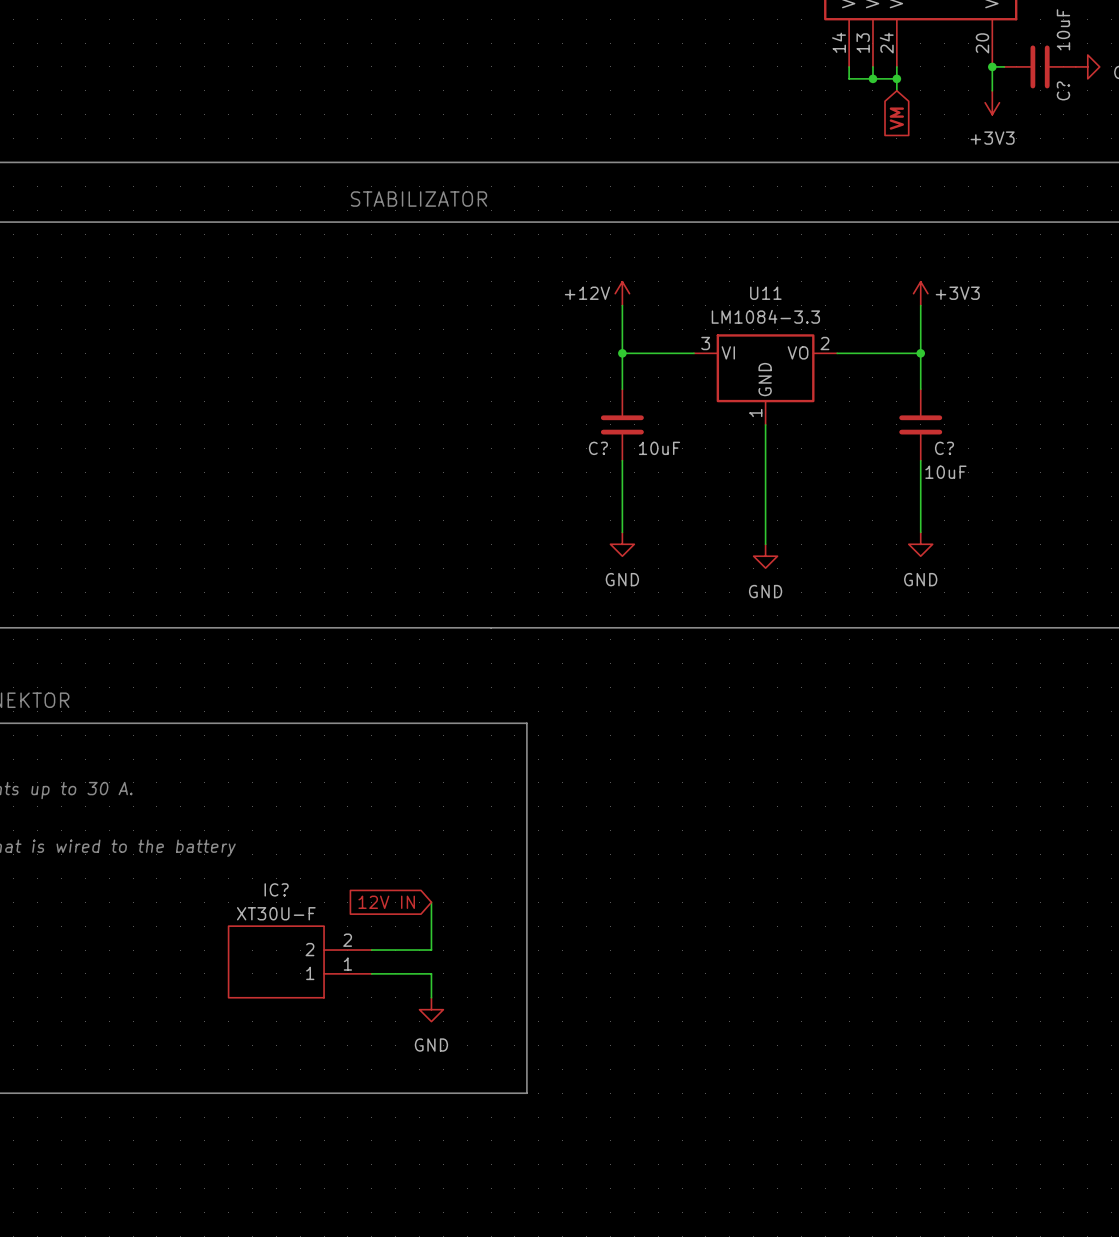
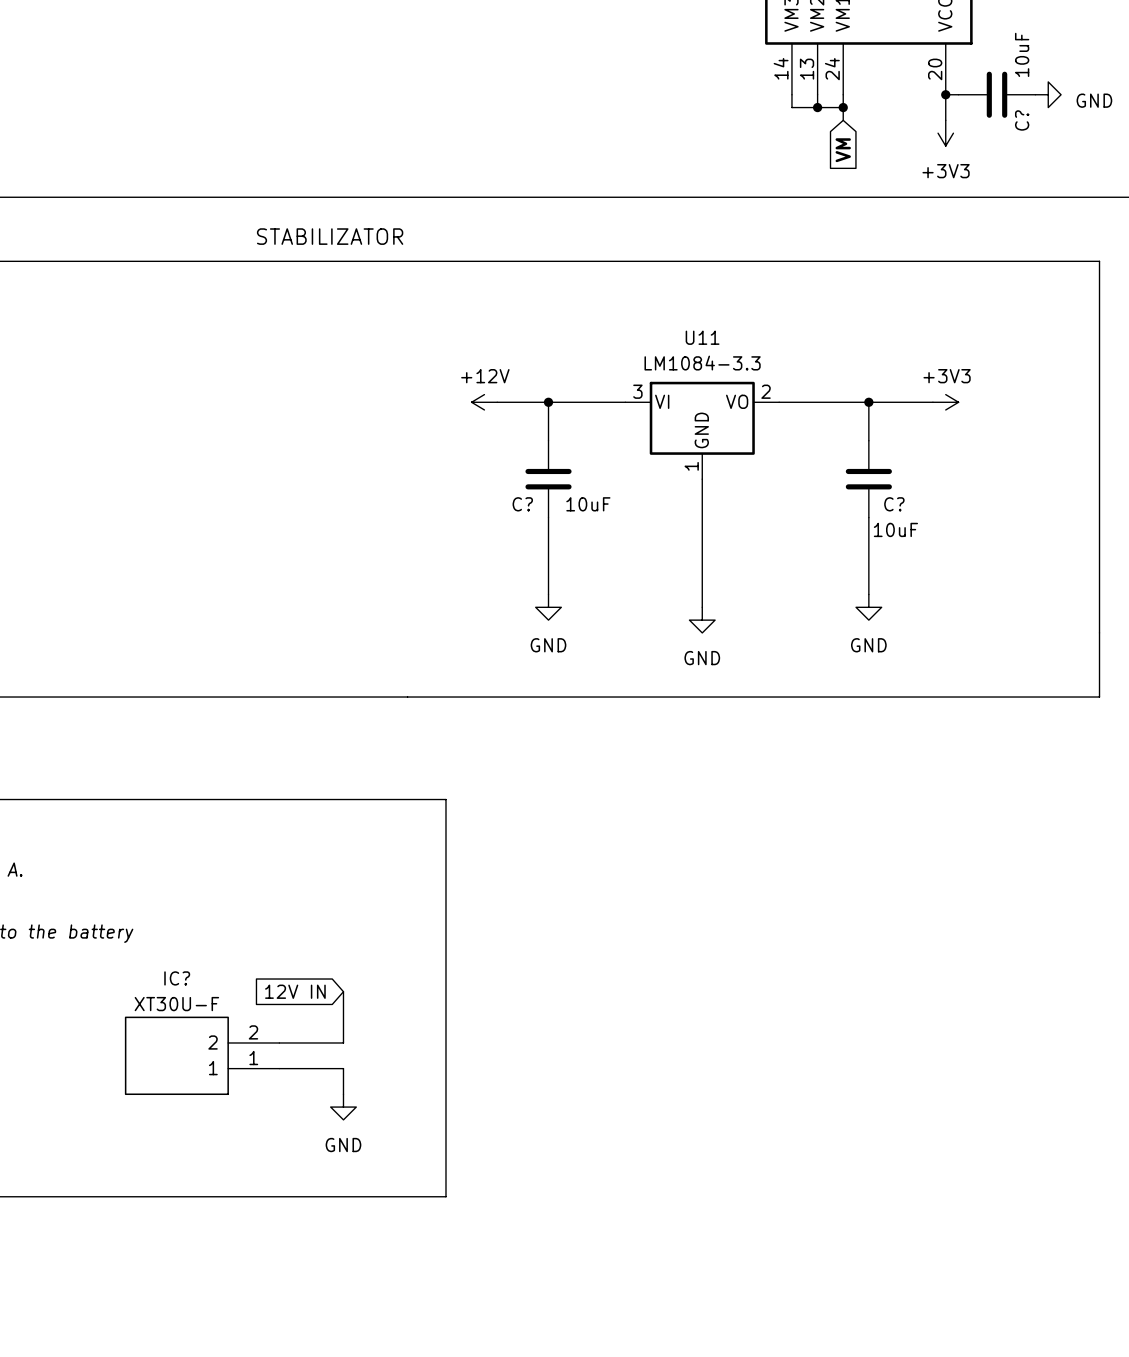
power symbol text position: +12V (587, 293) -> +12V (485, 376)
power symbol rotation: 0° (622, 293) -> 90° counterclockwise (484, 402)
power symbol position: +12V (622, 293) -> +12V (484, 402)
power symbol rotation: 0° (920, 293) -> 90° clockwise (945, 402)
power symbol position: +3V3 (920, 293) -> +3V3 (945, 402)
power symbol text position: +3V3 (957, 293) -> +3V3 (947, 376)
wire: (622, 305) (622, 353) -> (497, 402) (548, 402)
wire: (920, 305) (920, 353) -> (932, 402) (868, 402)

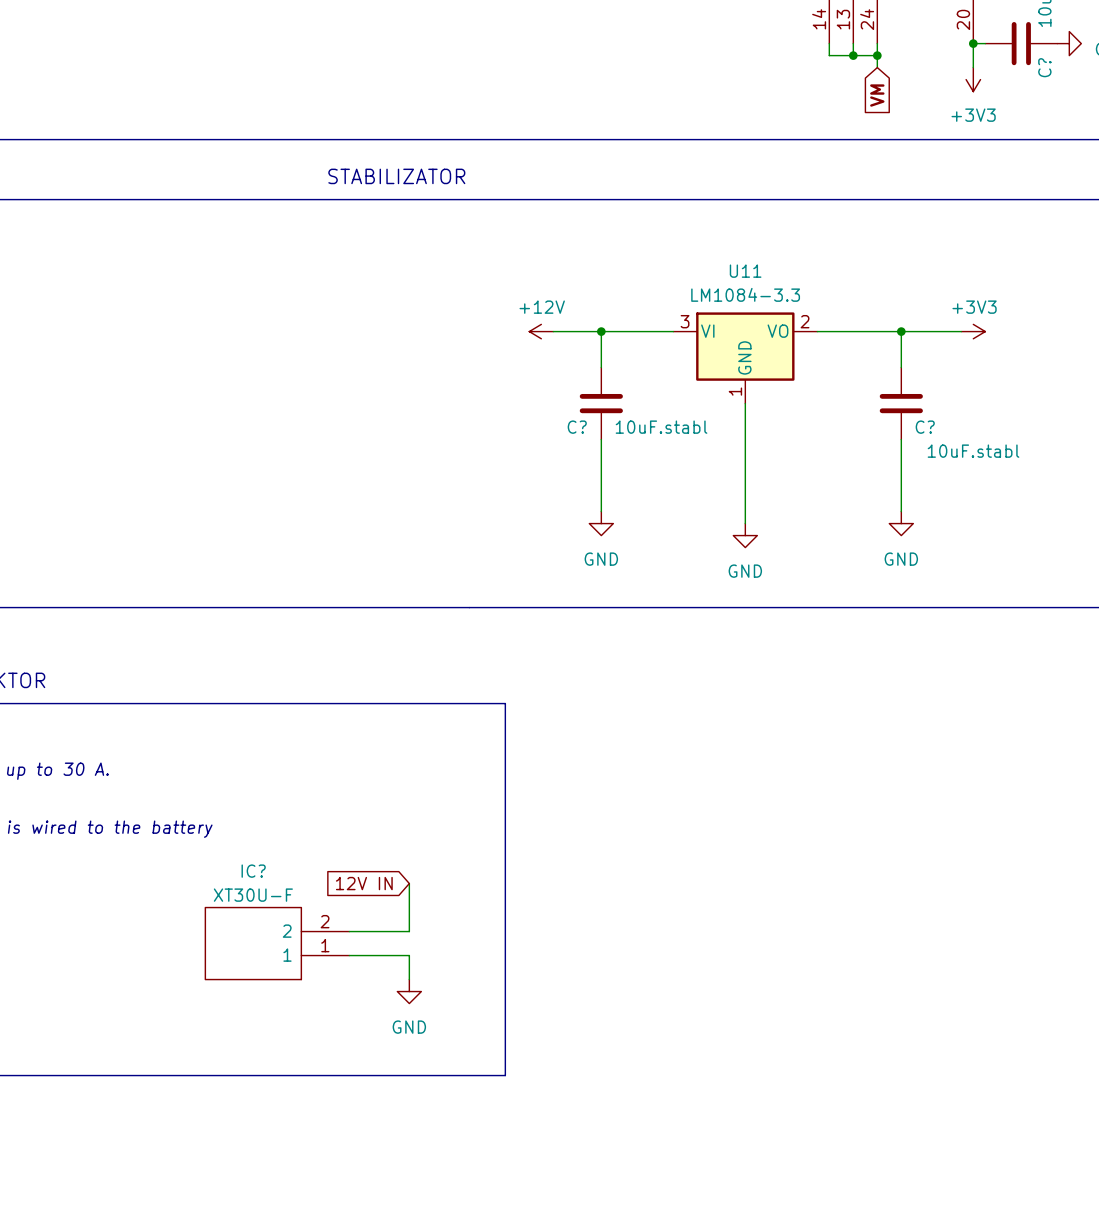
C? value: 10uF (588, 504) -> 10uF.stabl (661, 427)
C? value: 10uF (895, 529) -> 10uF.stabl (973, 451)

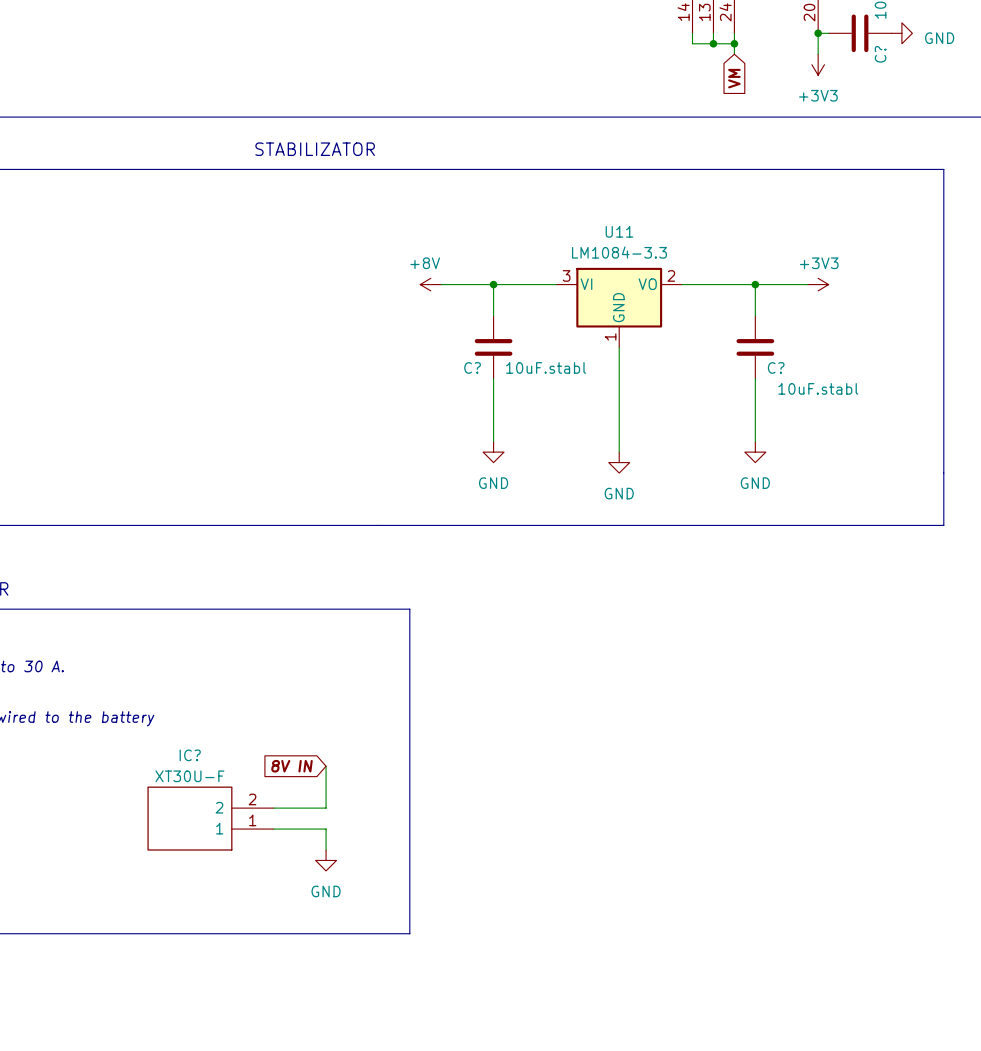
power symbol: none -> +8V (430, 284)
power symbol: +12V (541, 331) -> none
global label: 12V IN (364, 883) -> 8V IN (291, 766)

